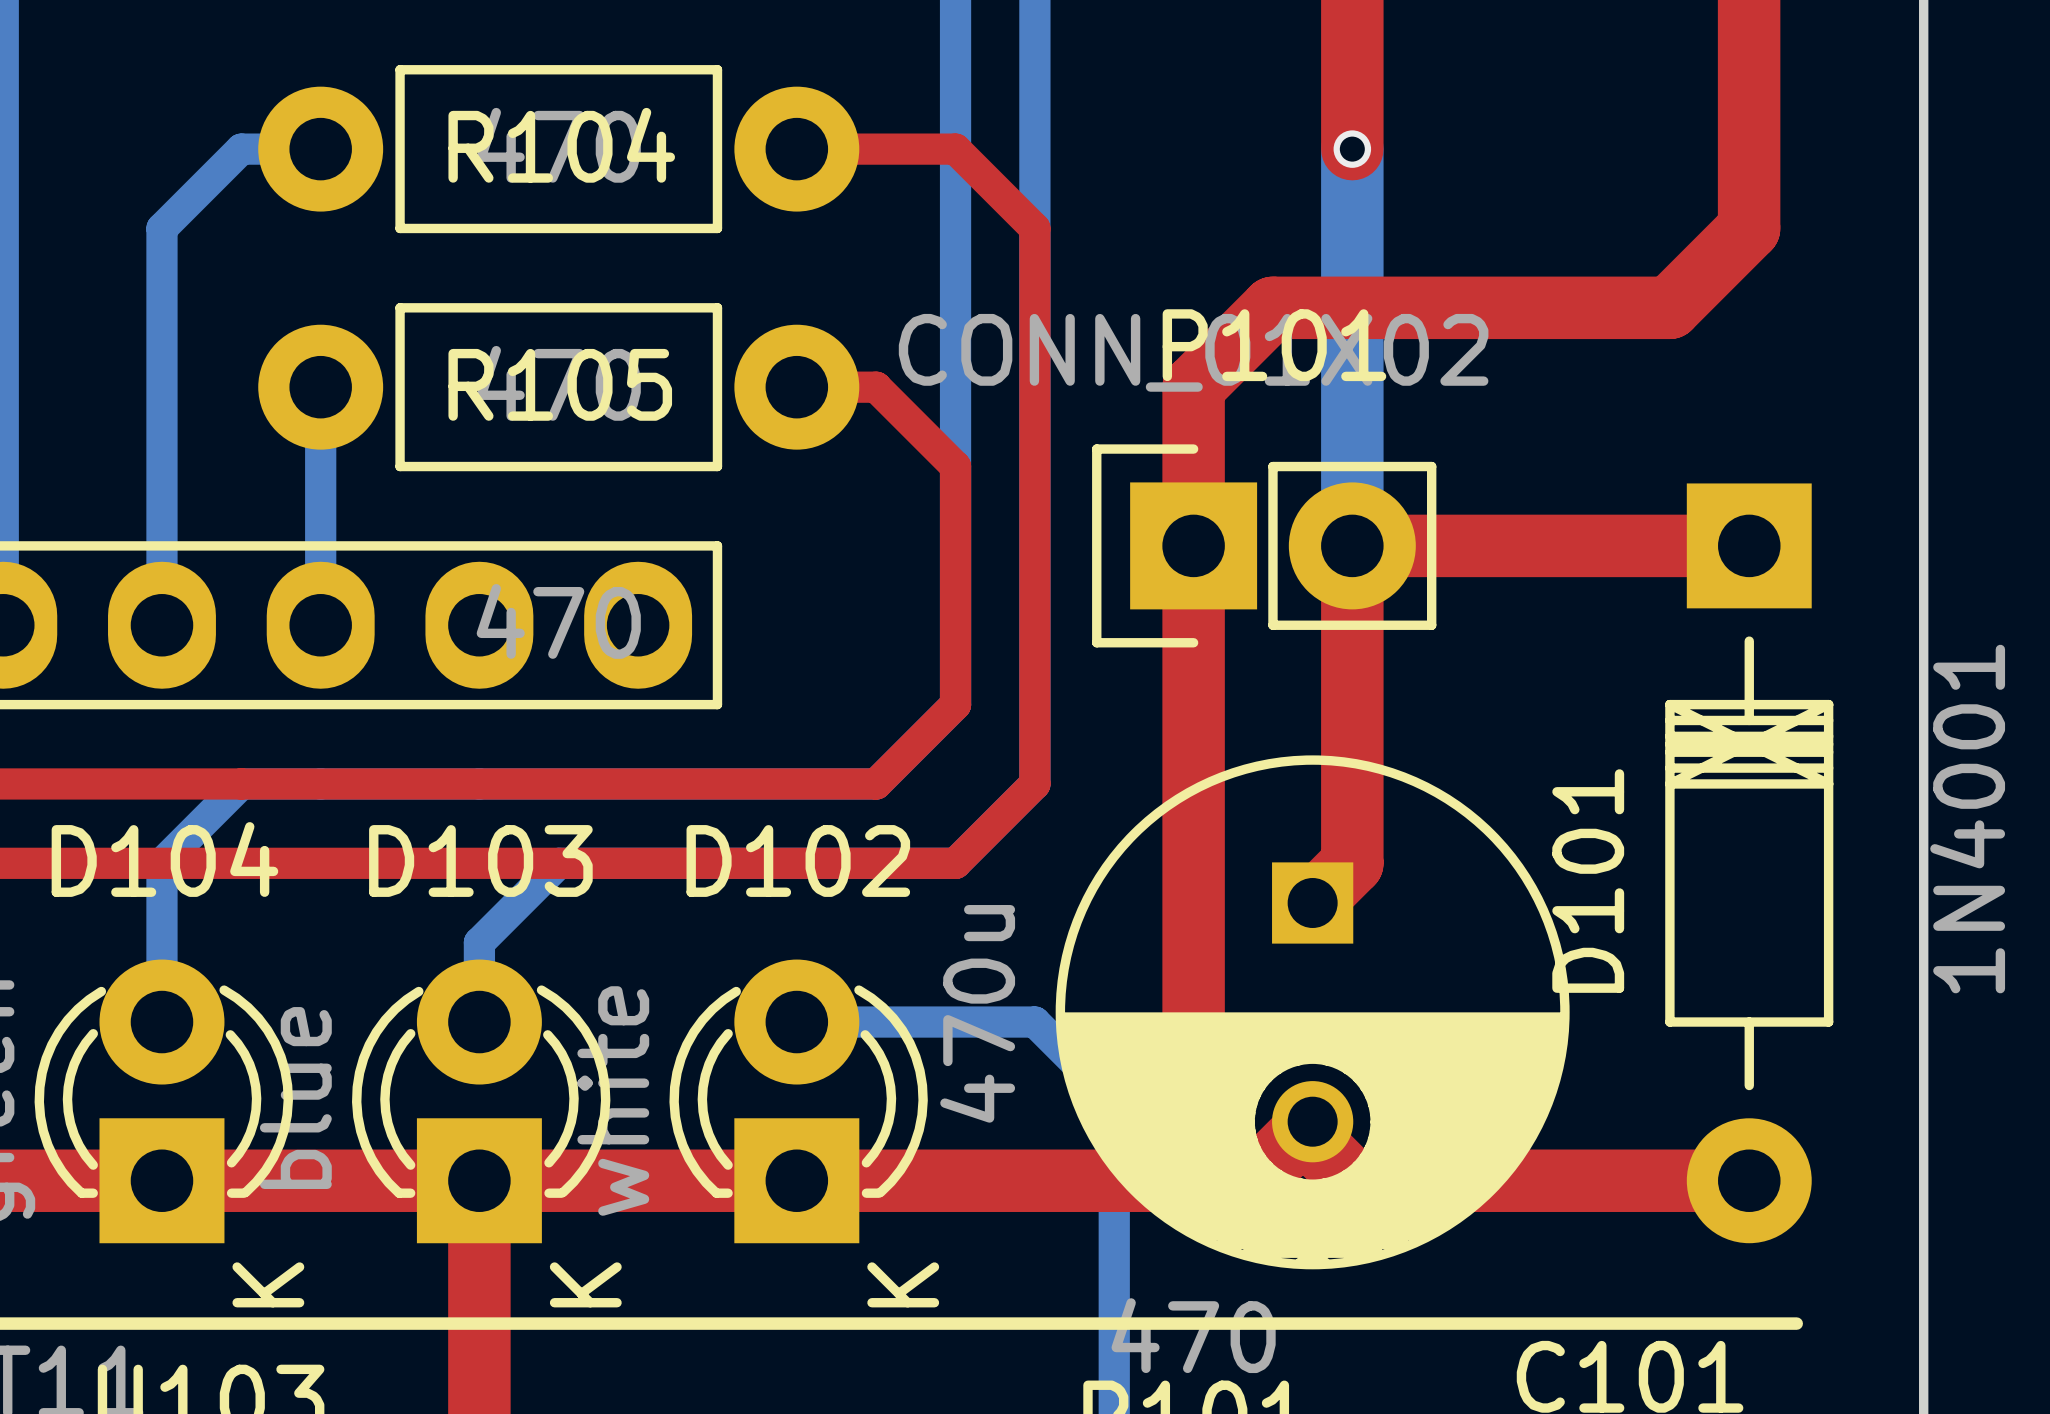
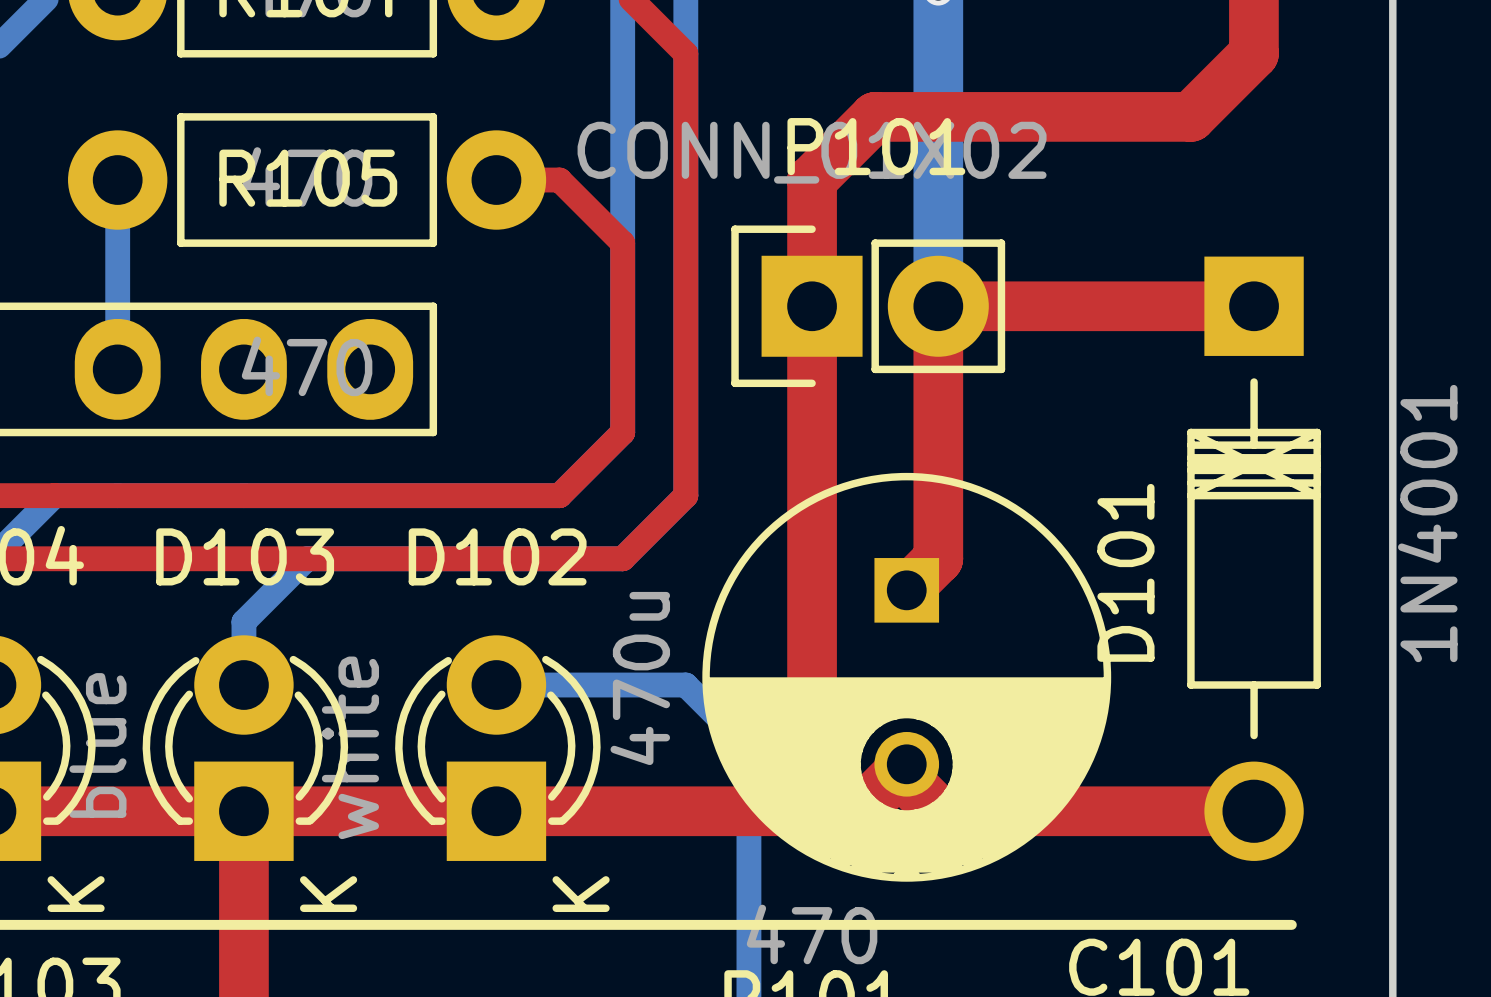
D101 footprint: [1665, 483, 1834, 1244] -> [1187, 256, 1321, 861]

